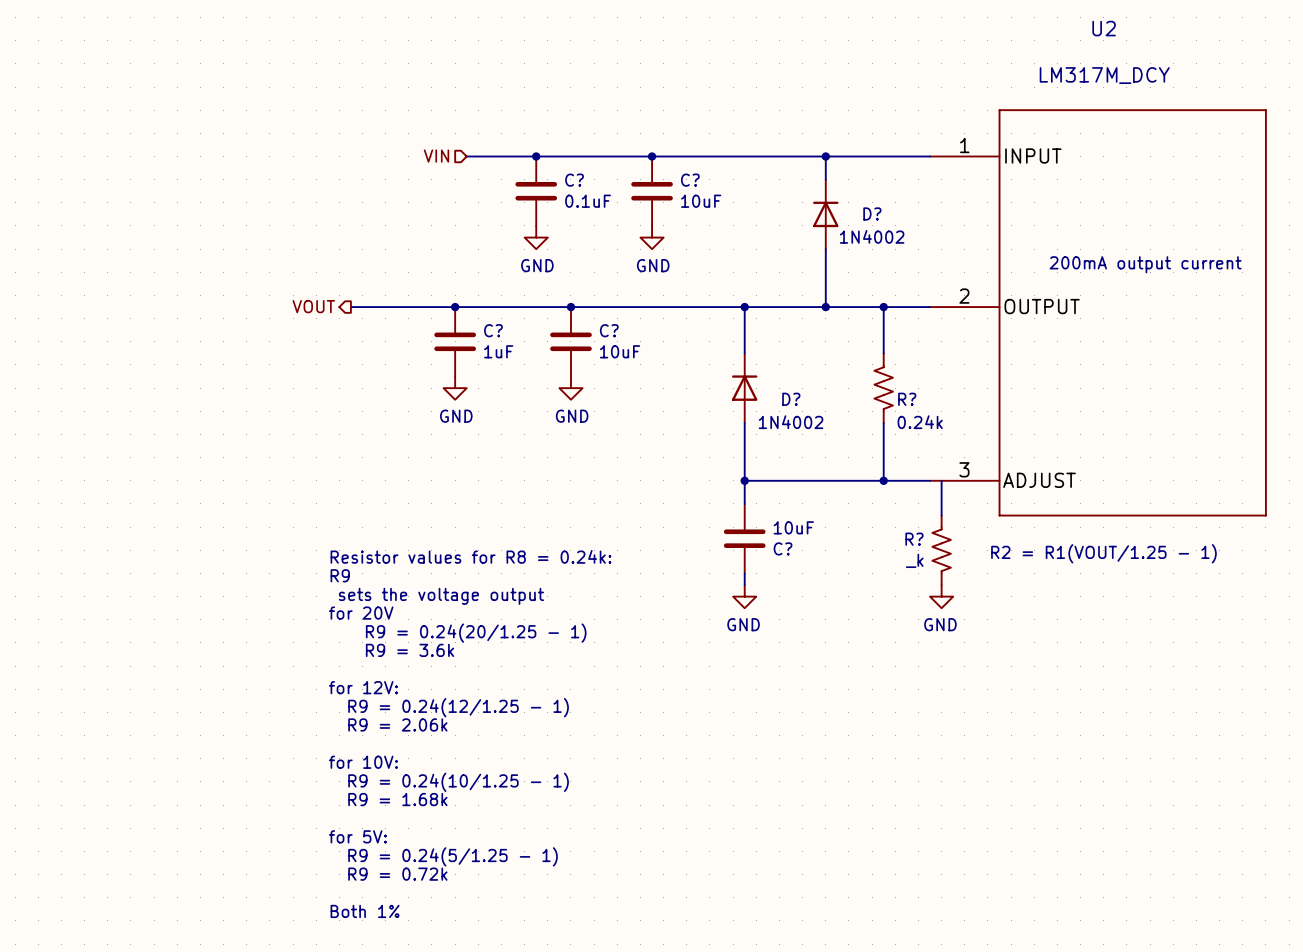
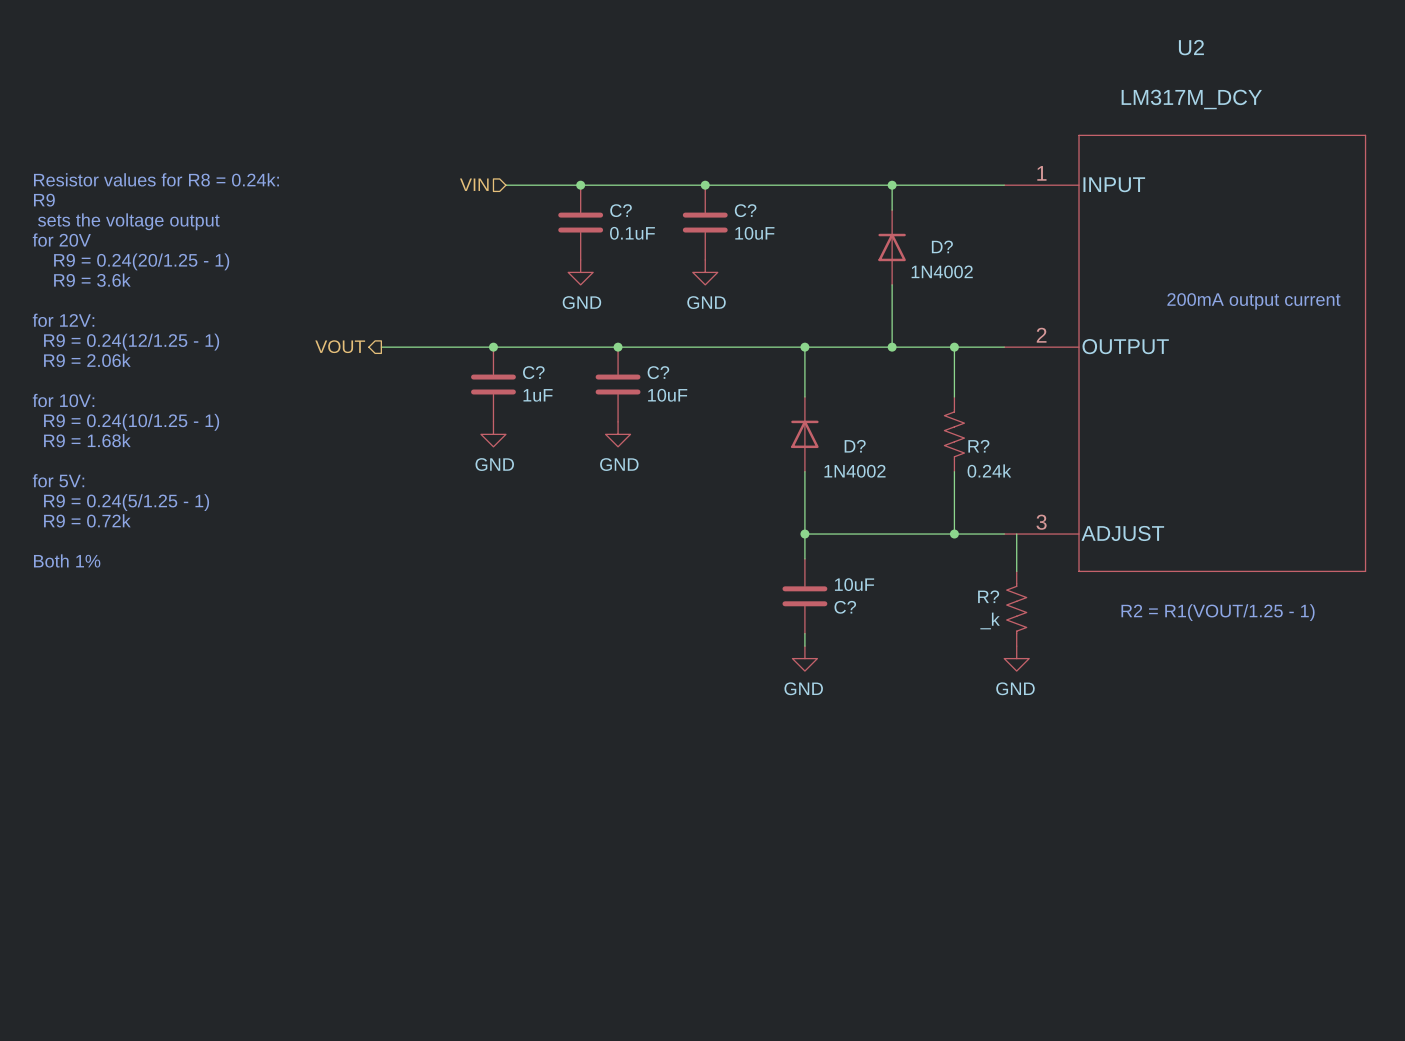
text: none -> Resistor values for R8 = 0.24k: (156, 179)
text: none -> R9 (44, 200)
text: none -> sets the voltage output (128, 221)
text: none -> for 20V (61, 240)
text: none -> R9 = 0.24(20/1.25 - 1) (141, 261)
text: none -> R9 = 3.6k (92, 280)
text: none -> for 12V: (63, 320)
text: none -> R9 = 0.24(12/1.25 - 1) (131, 342)
text: none -> R9 = 2.06k (87, 360)
text: none -> for 10V: (63, 400)
text: none -> R9 = 0.24(10/1.25 - 1) (131, 422)
text: none -> R9 = 1.68k (87, 440)
text: none -> for 5V: (58, 480)
text: none -> R9 = 0.24(5/1.25 - 1) (126, 502)
text: none -> R9 = 0.72k (87, 520)
text: none -> Both 1% (67, 560)
text: Resistor values for R8 = 0.24k: (470, 556) -> none
text: R9 (340, 575) -> none
text: sets the voltage output (441, 596) -> none
text: for 20V (361, 613) -> none
text: R9 = 0.24(20/1.25 - 1) (476, 633) -> none
text: R9 = 3.6k (410, 650) -> none
text: for 12V: (363, 687) -> none
text: R9 = 0.24(12/1.25 - 1) (458, 707) -> none
text: R9 = 2.06k (397, 724) -> none
text: for 10V: (363, 762) -> none
text: R9 = 0.24(10/1.25 - 1) (458, 782) -> none
text: R9 = 1.68k (397, 799) -> none
text: for 5V: (357, 836) -> none
text: R9 = 0.24(5/1.25 - 1) (453, 856) -> none
text: R9 = 0.72k (397, 874) -> none
text: Both 1% (365, 911) -> none

